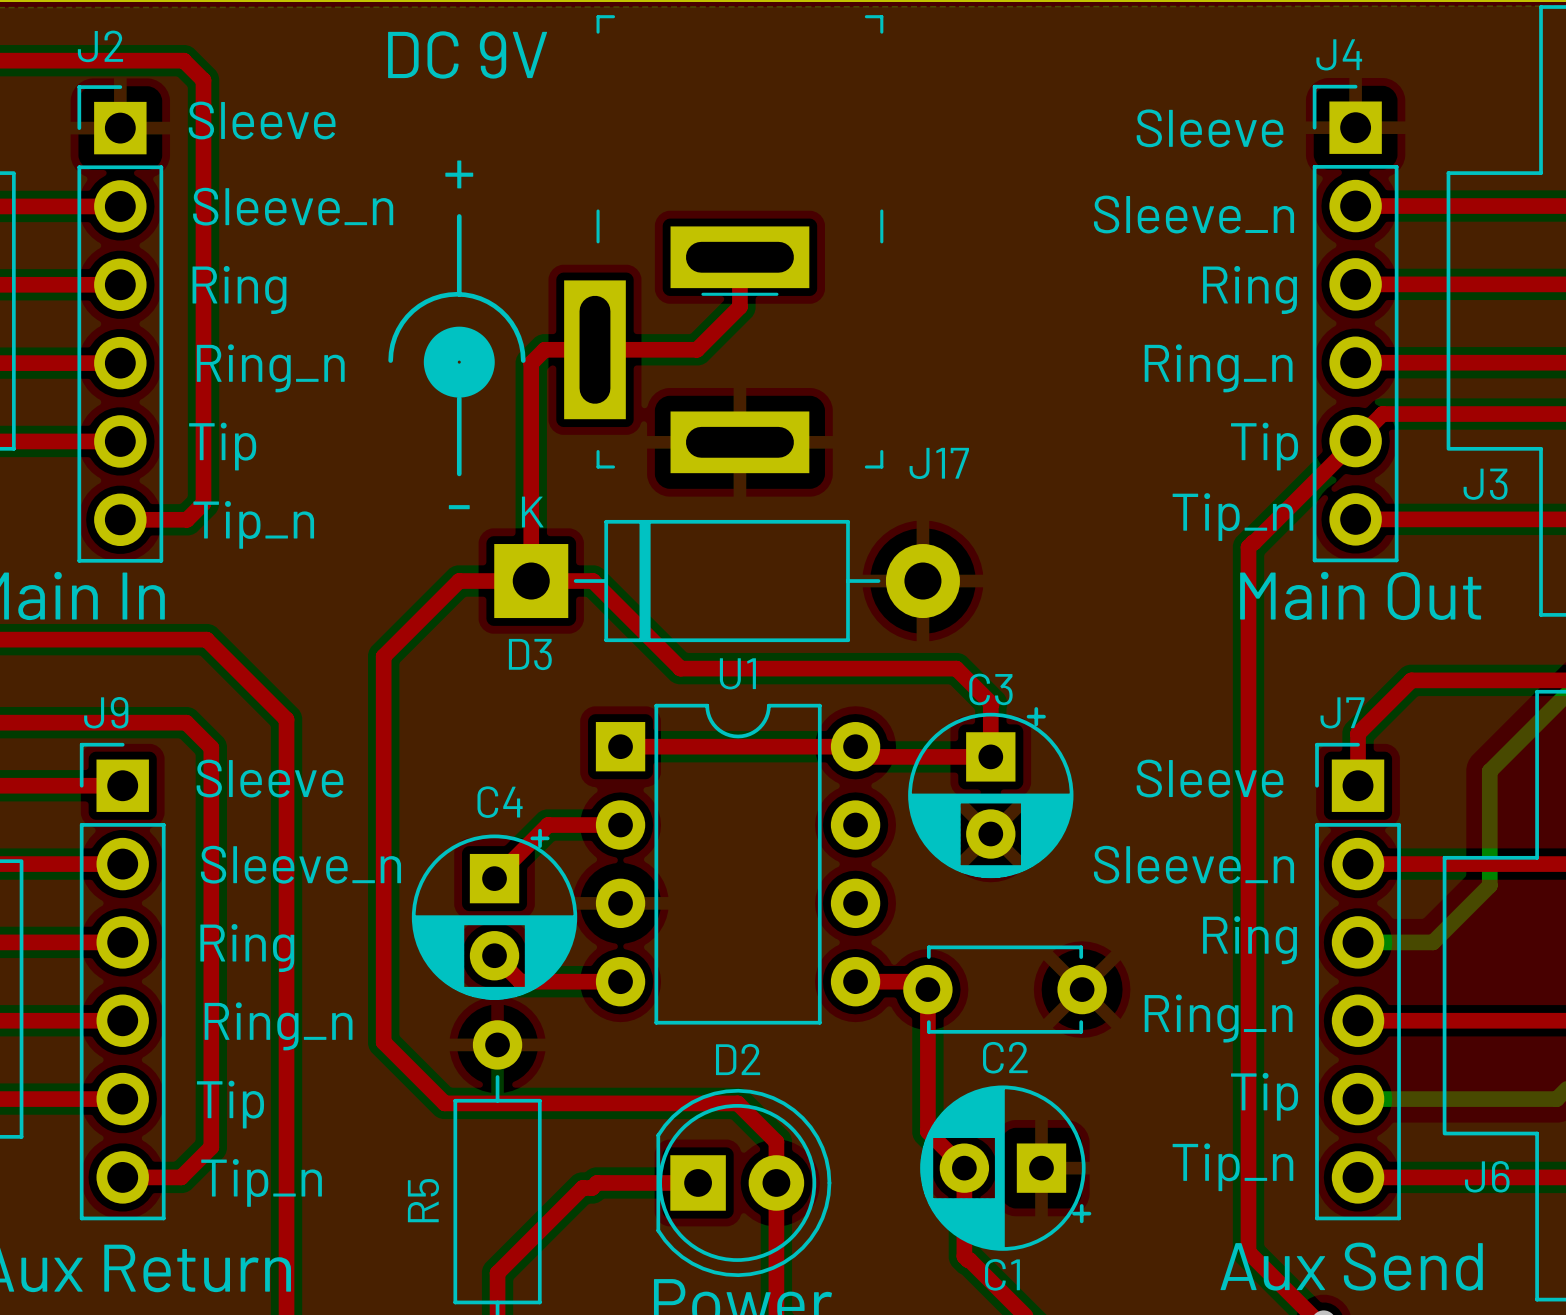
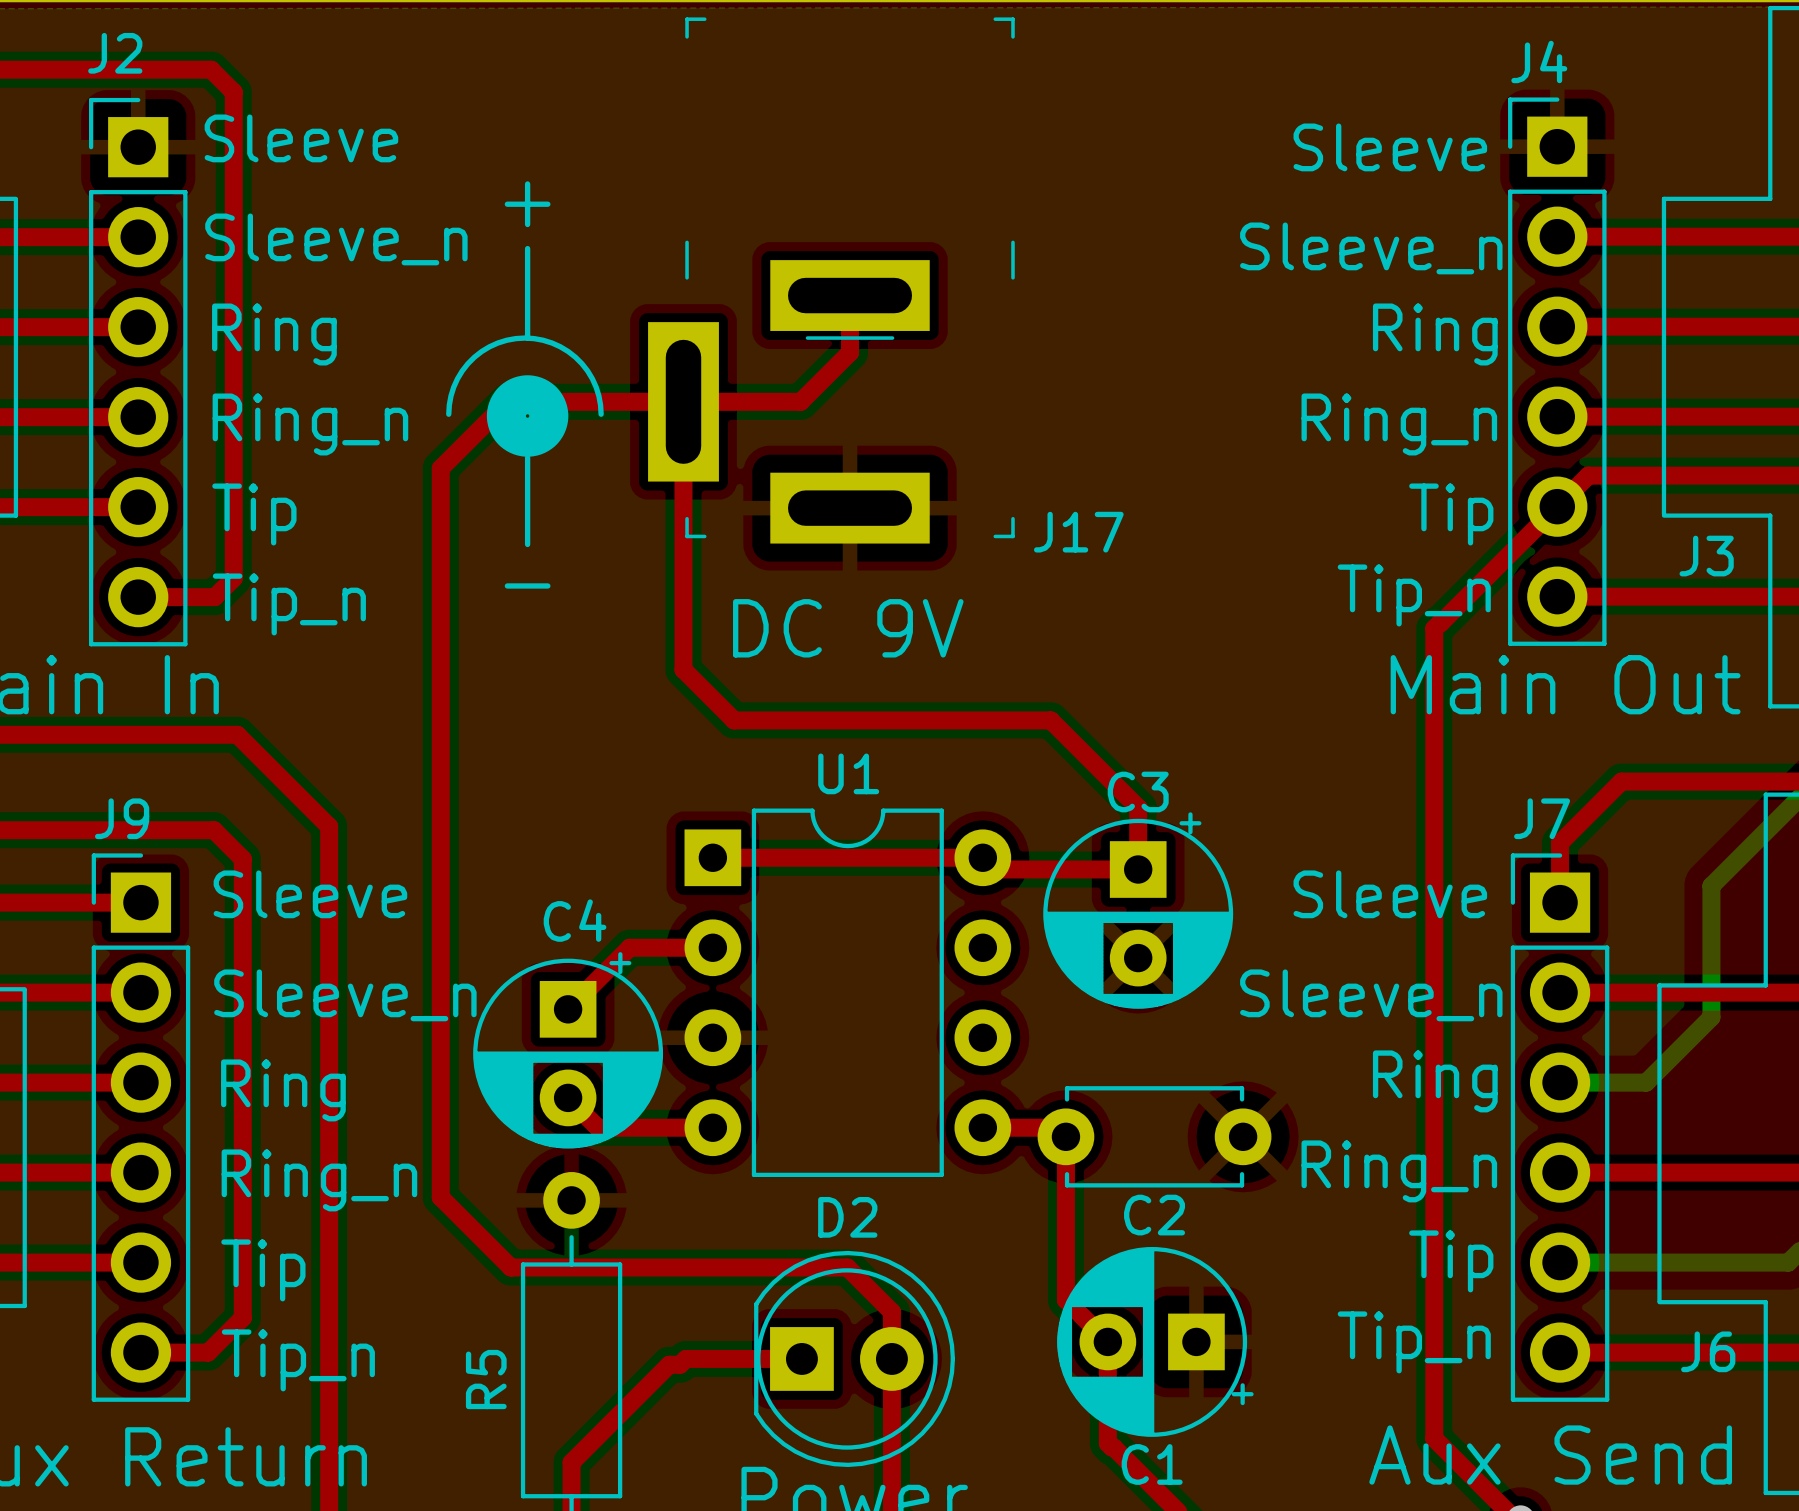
text position: DC 9V (467, 55) -> DC 9V (848, 628)
top track: (544, 349) (531, 363) (531, 581) -> (625, 401) (507, 401) (440, 468) (440, 754)
D3: (727, 581) -> none
top track: (594, 583) (592, 581) (459, 581) (383, 656) -> (683, 669) (683, 401)
top track: (639, 627) (680, 668) (956, 668) -> (734, 720) (1050, 720) (1098, 768)

